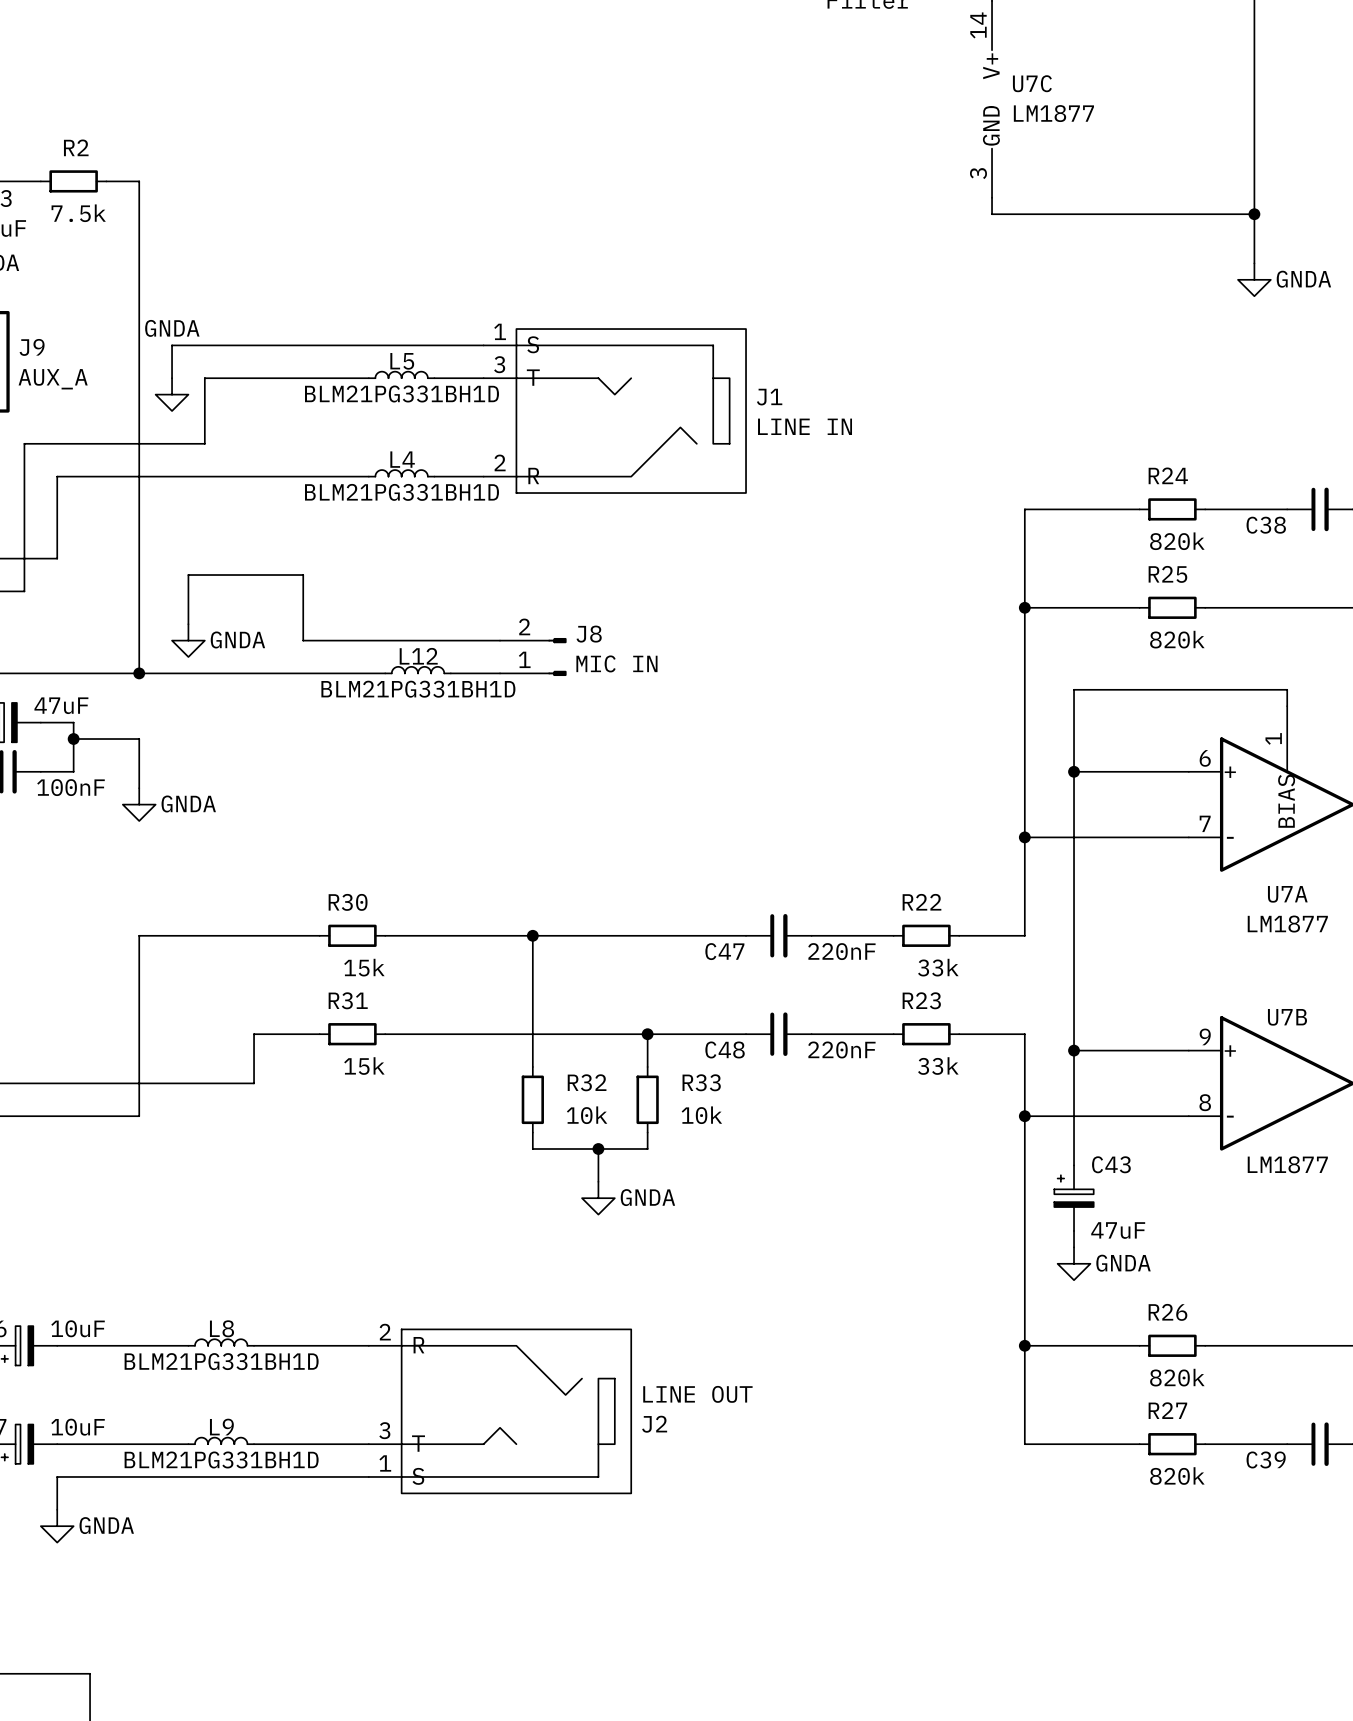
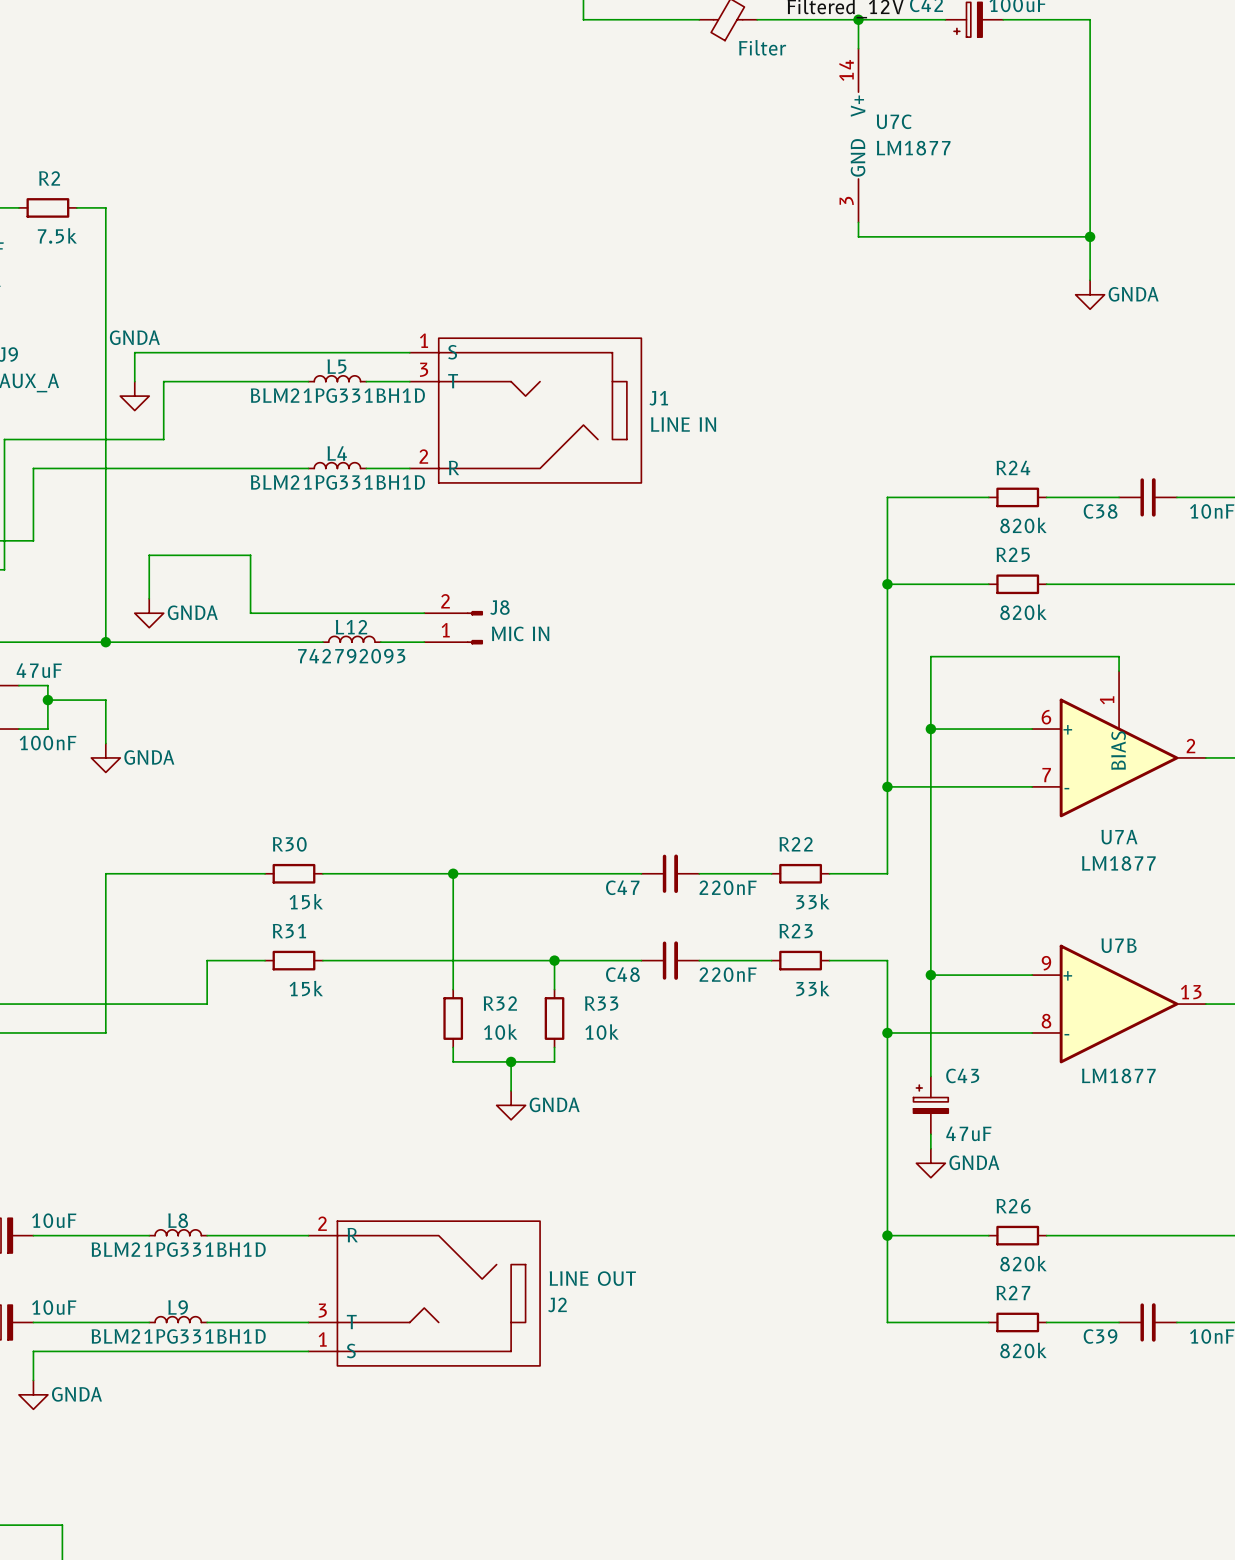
L12 value: BLM21PG331BH1D (418, 689) -> 742792093 (351, 656)

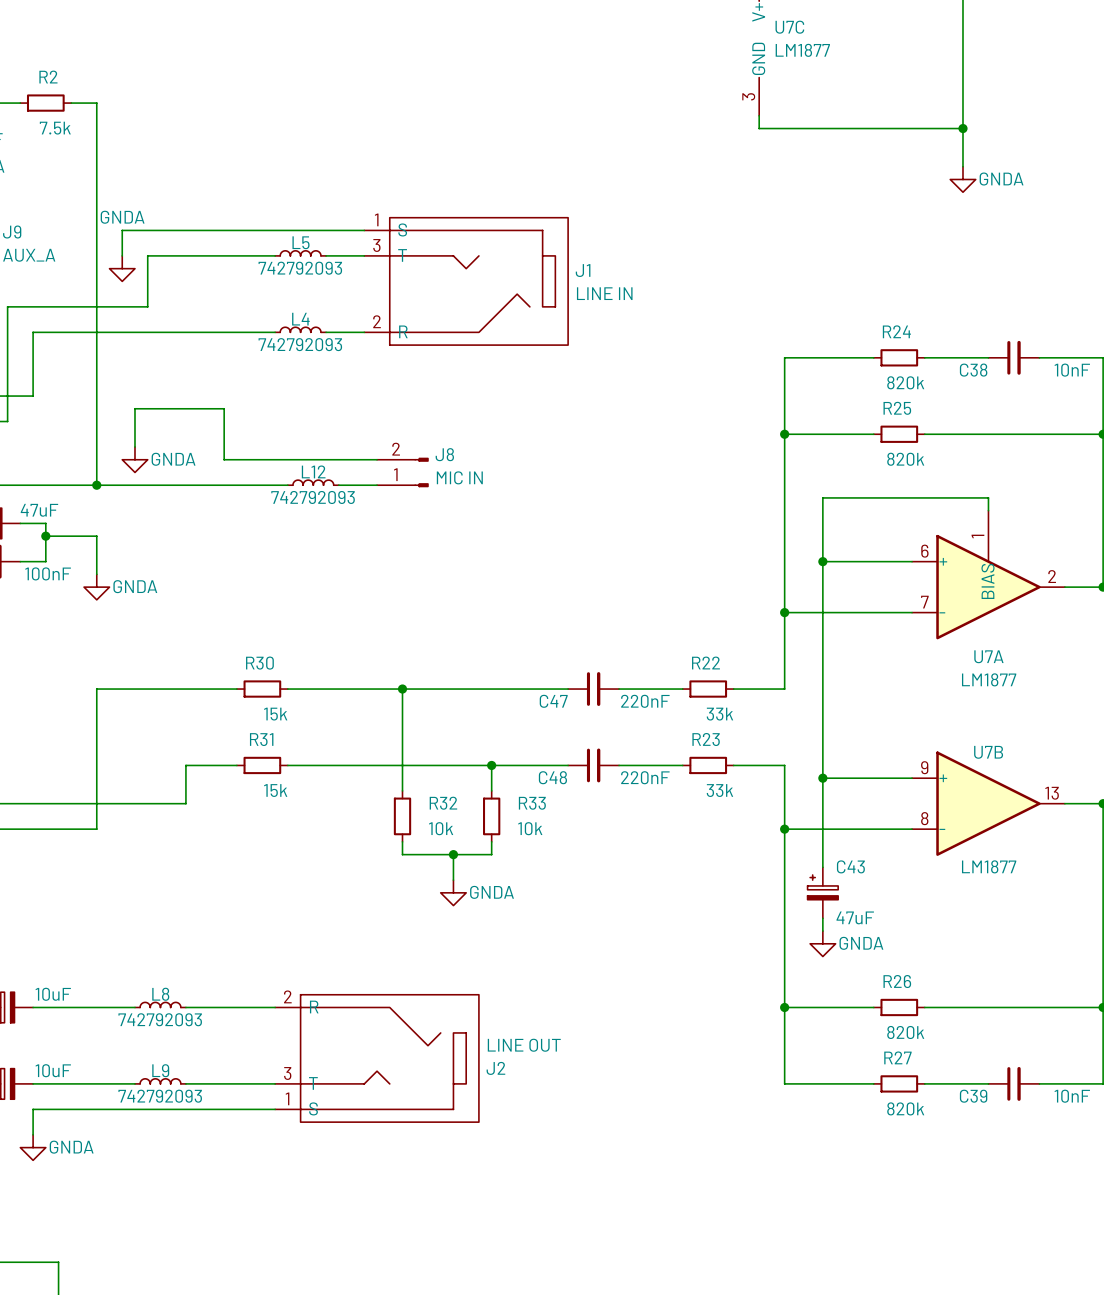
L5 value: BLM21PG331BH1D (337, 395) -> 742792093 (300, 268)
L4 value: BLM21PG331BH1D (337, 482) -> 742792093 (300, 344)
L8 value: BLM21PG331BH1D (178, 1249) -> 742792093 (160, 1019)
L9 value: BLM21PG331BH1D (178, 1336) -> 742792093 (160, 1096)

